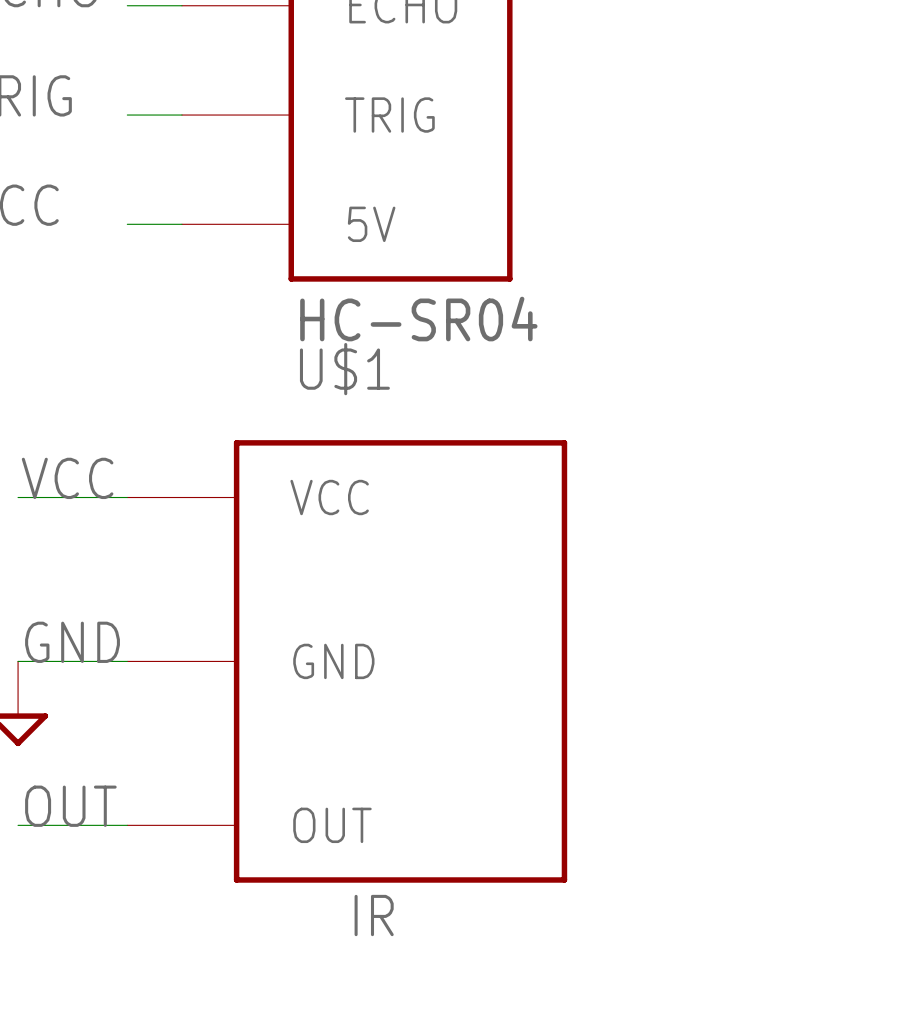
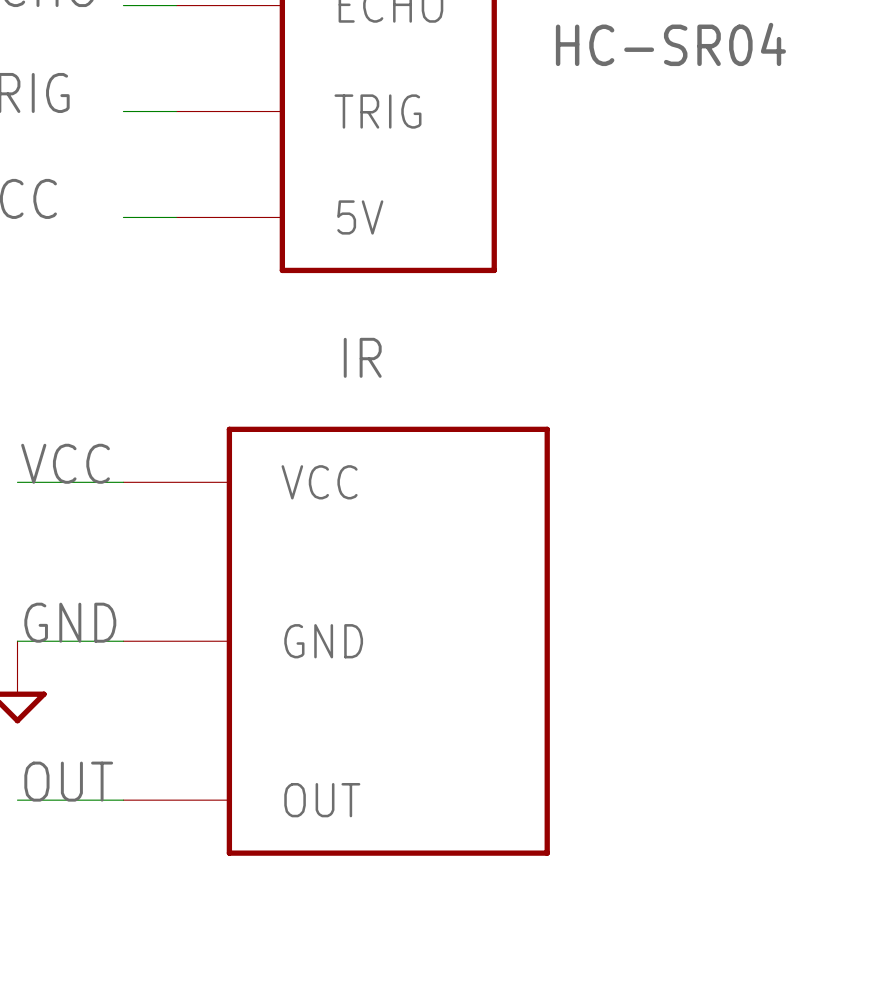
part value position: HC-SR04 (418, 319) -> HC-SR04 (670, 44)
U$1 name: U$1 (344, 369) -> none
U$1 value position: IR (374, 915) -> IR (362, 357)

